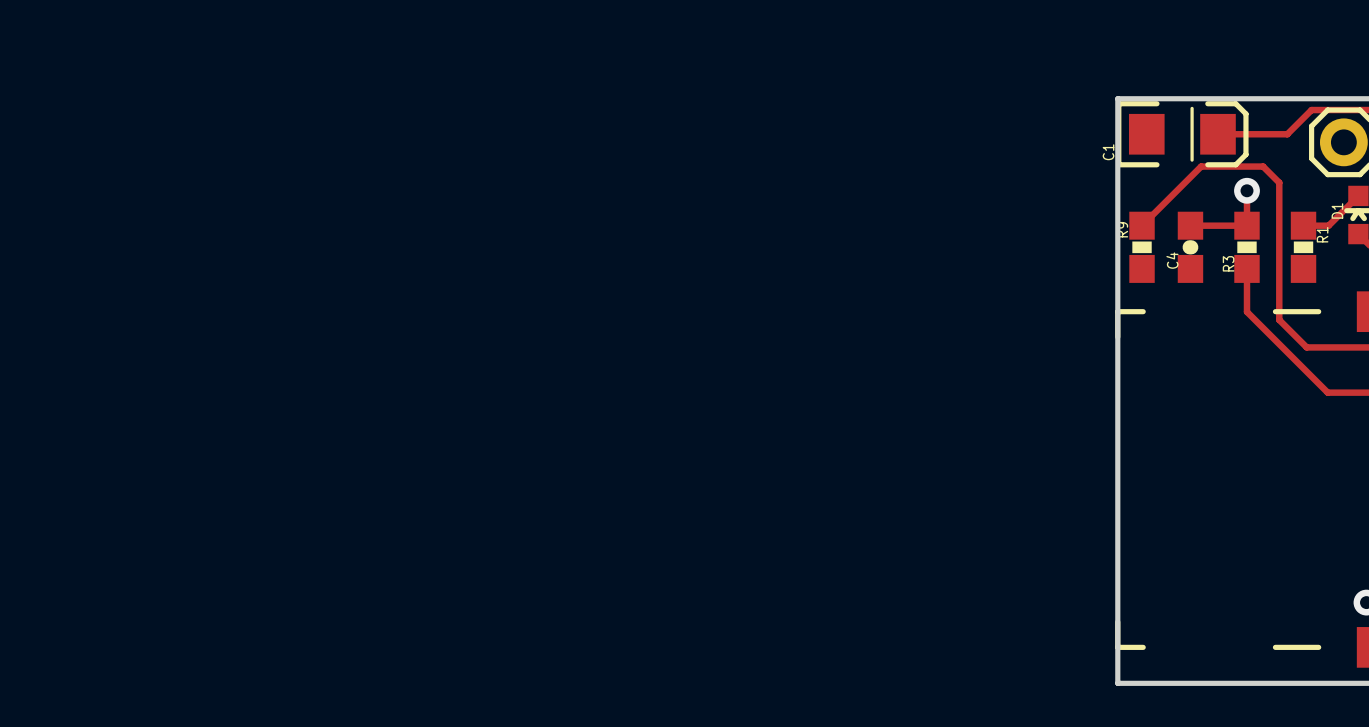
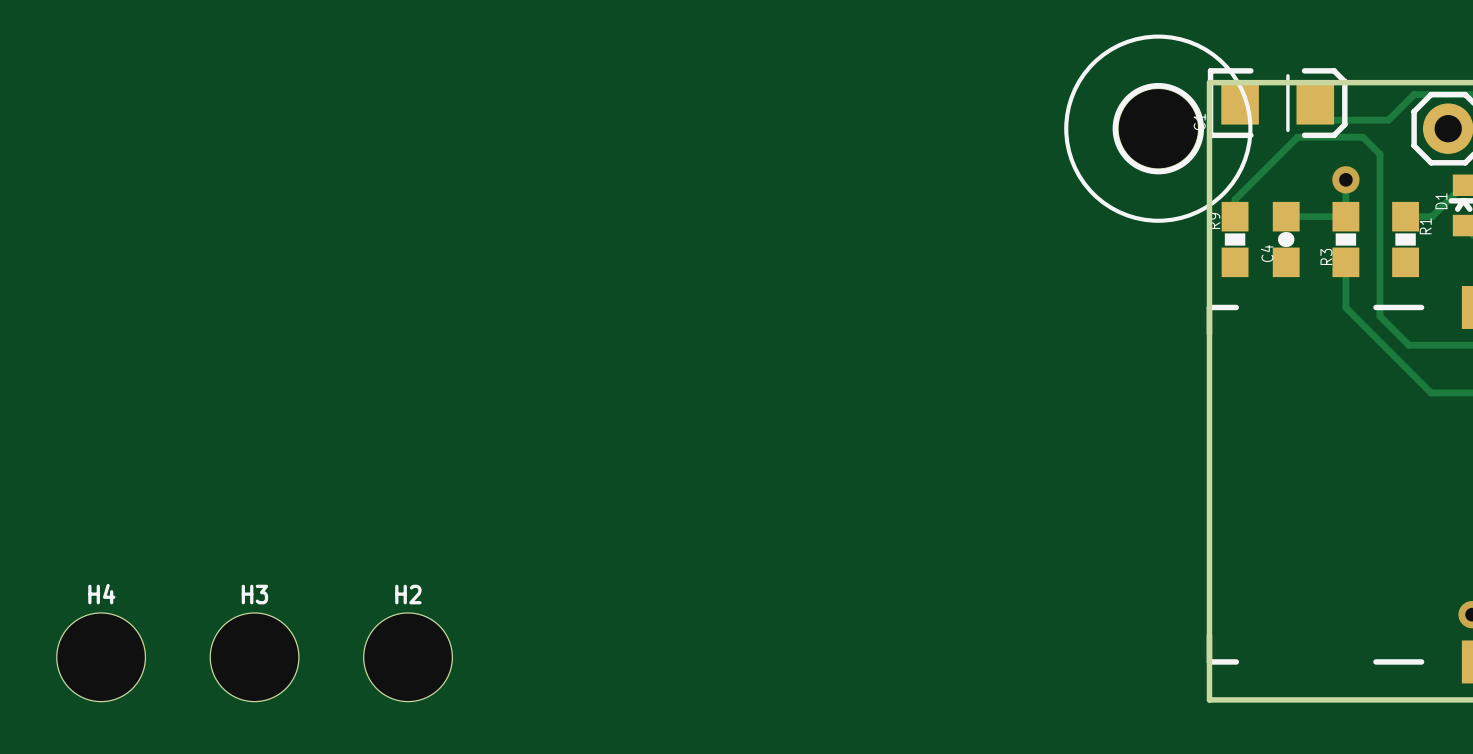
C1 position: (1182, 134) -> (1277, 103)
part: none -> (1158, 128)
track: (1279, 182) (1263, 166) (1201, 166) (1142, 225) -> (1380, 171) (1380, 154) (1362, 137) (1297, 137) (1235, 199) (1235, 216)
H4: none -> (101, 657)
H3: none -> (254, 657)
H2: none -> (408, 657)

